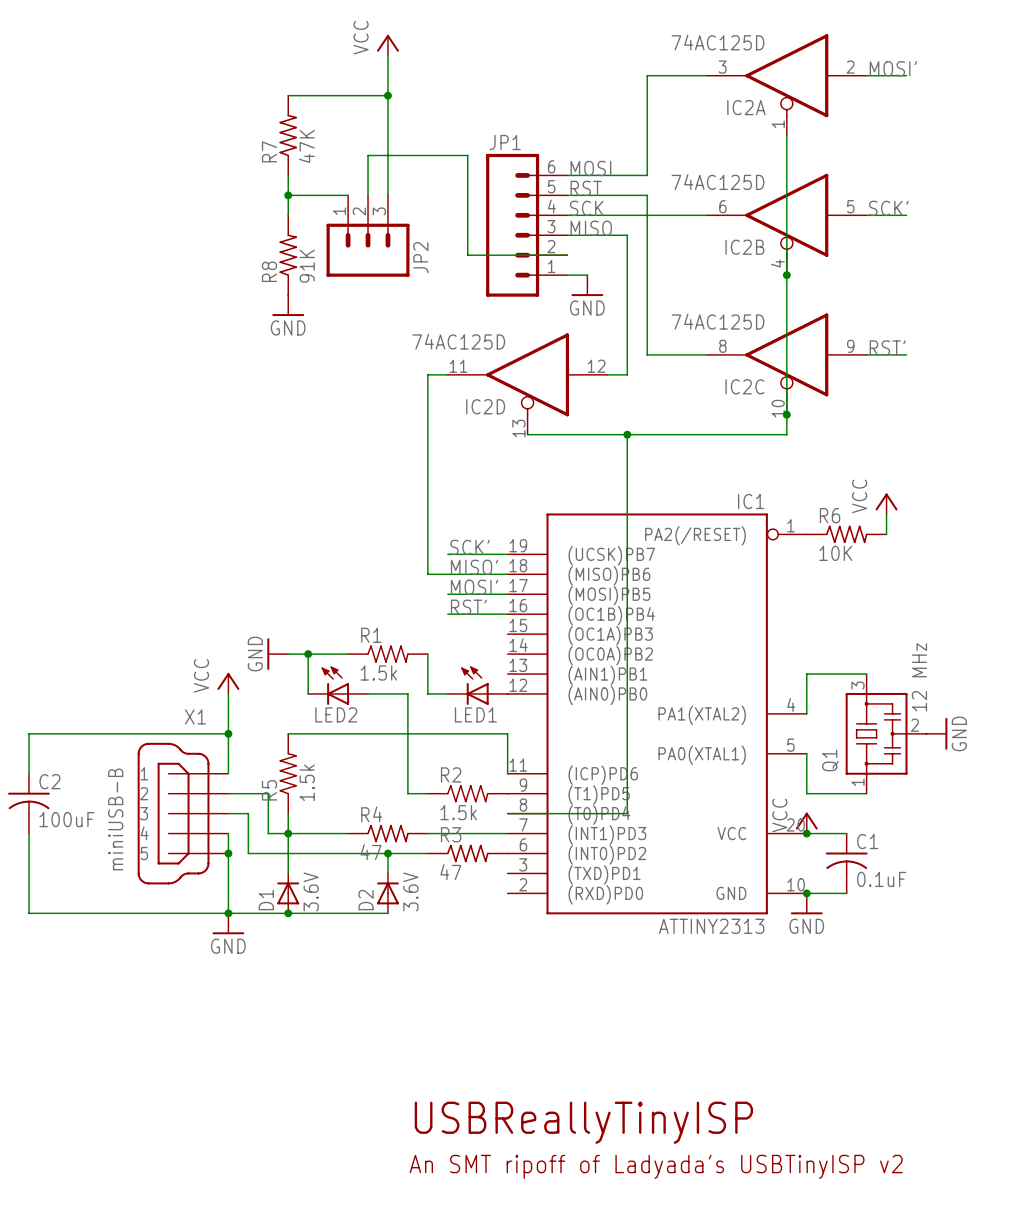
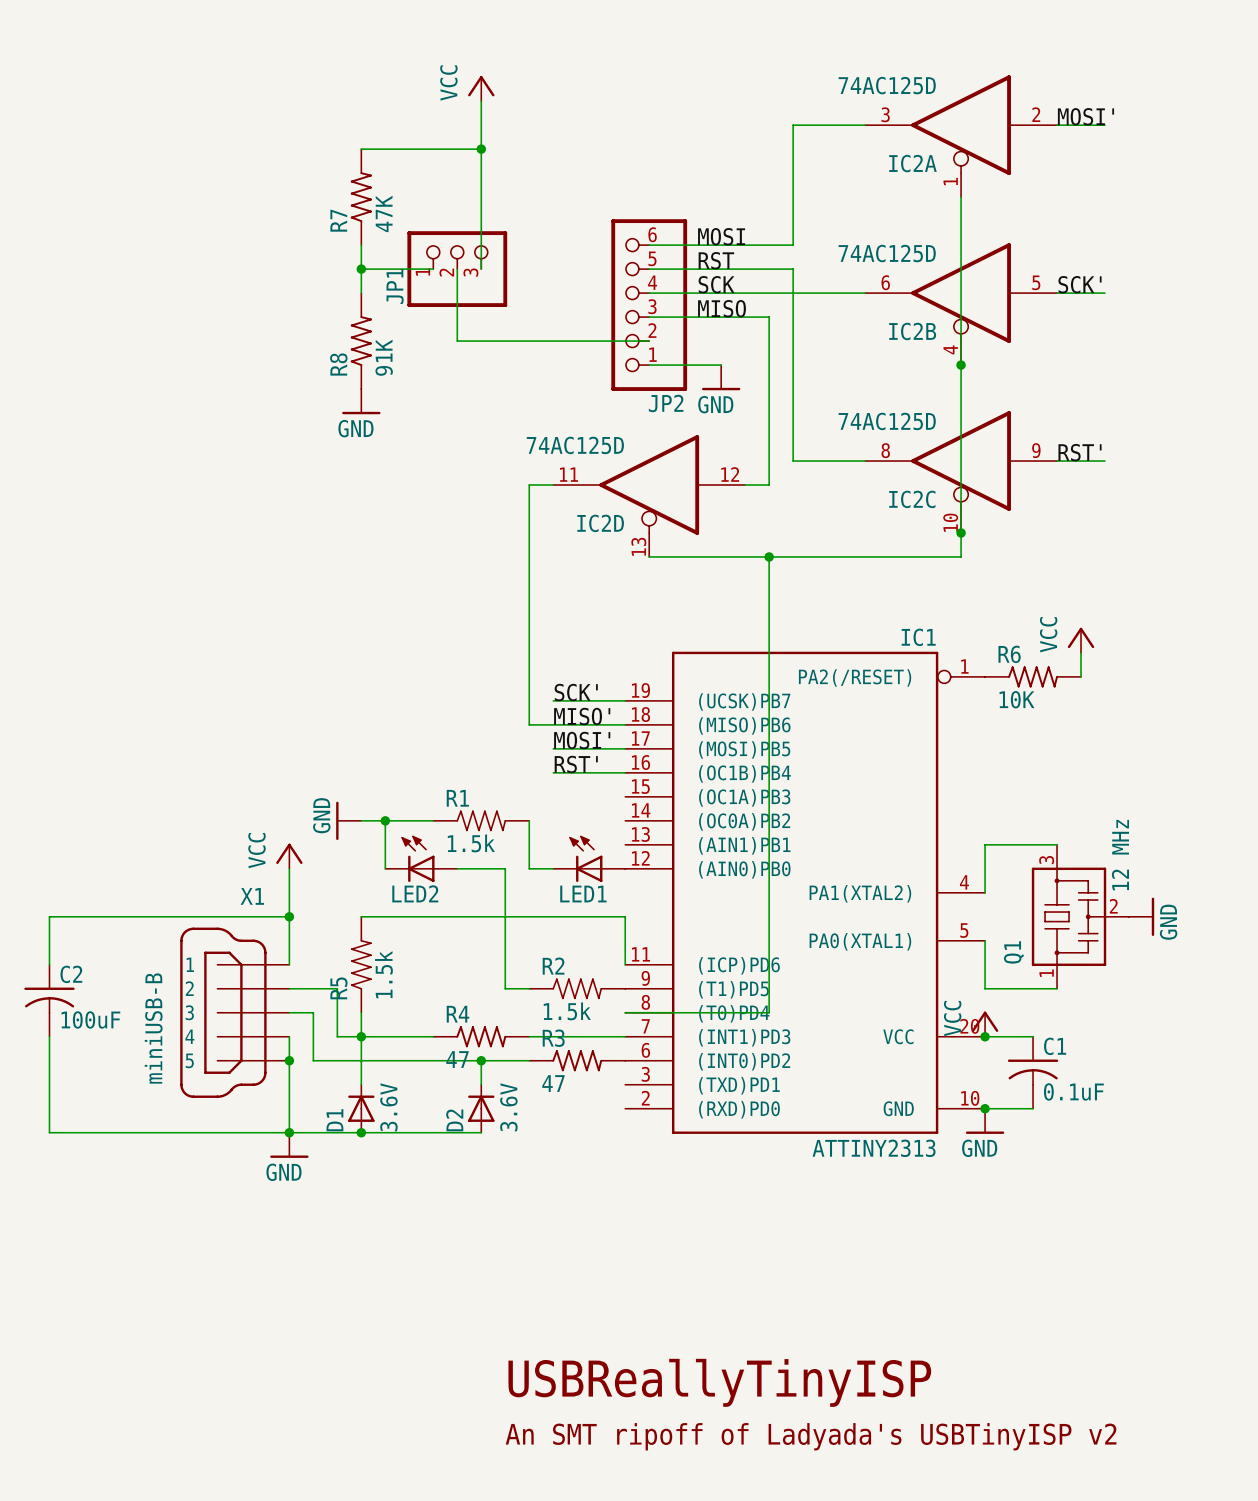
JP1 name position: JP1 (505, 142) -> JP1 (395, 286)
JP1 symbol: [486, 153, 568, 297] -> [407, 231, 508, 308]
JP2 symbol: [326, 195, 410, 277] -> [611, 219, 688, 391]
wire: (368, 195) (368, 155) (467, 155) (467, 255) -> (457, 269) (457, 341) (577, 341)
JP2 name position: JP2 (420, 257) -> JP2 (666, 403)

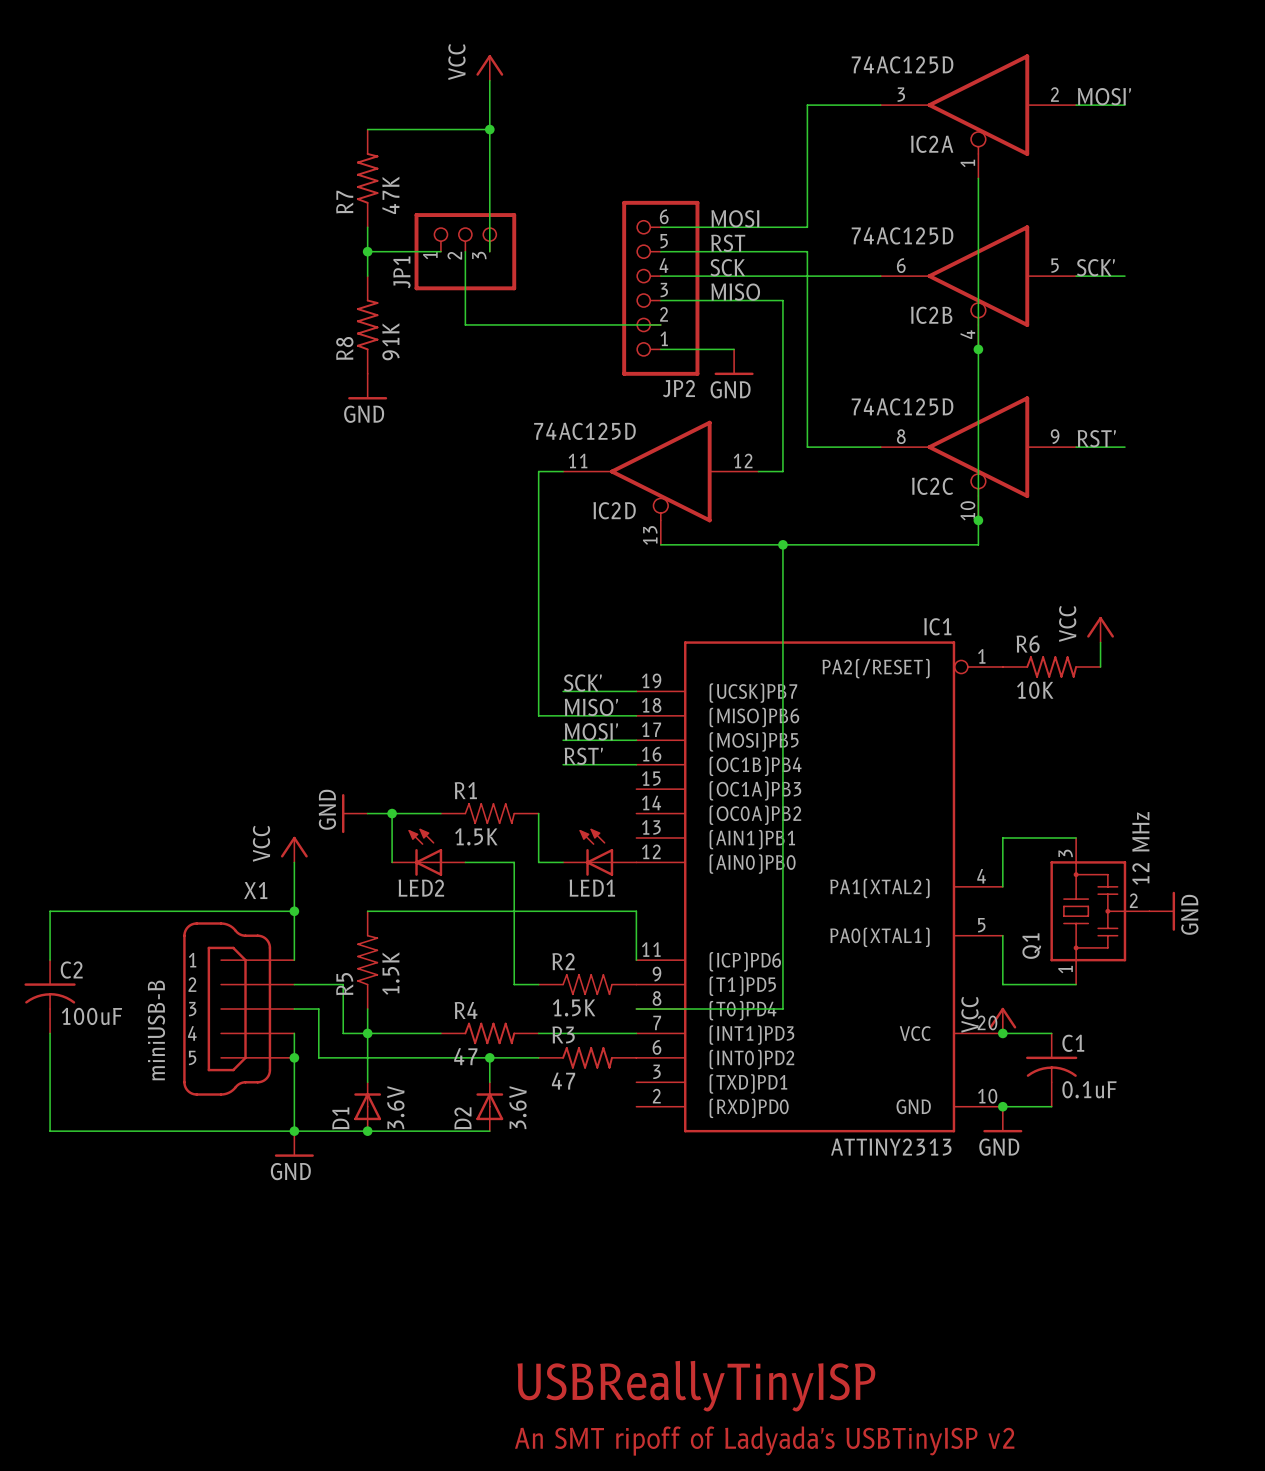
R1 value: 1.5k (471, 843) -> 1.5K (476, 836)
R5 value: 1.5k (383, 974) -> 1.5K (390, 973)
R2 value: 1.5k (567, 1011) -> 1.5K (574, 1007)

